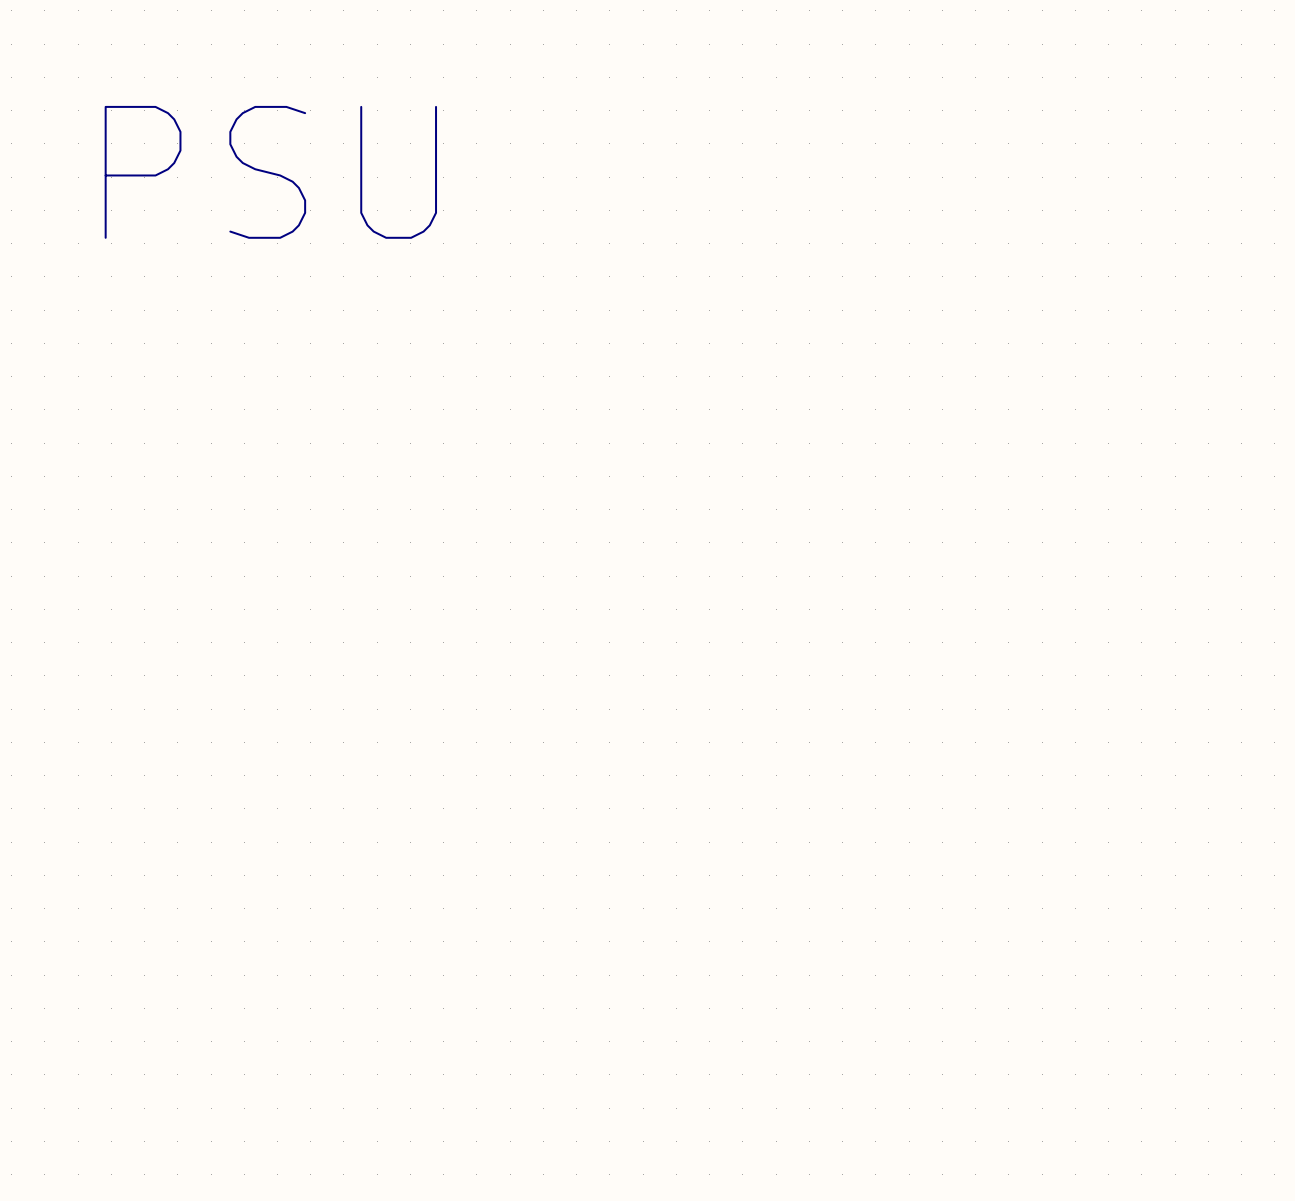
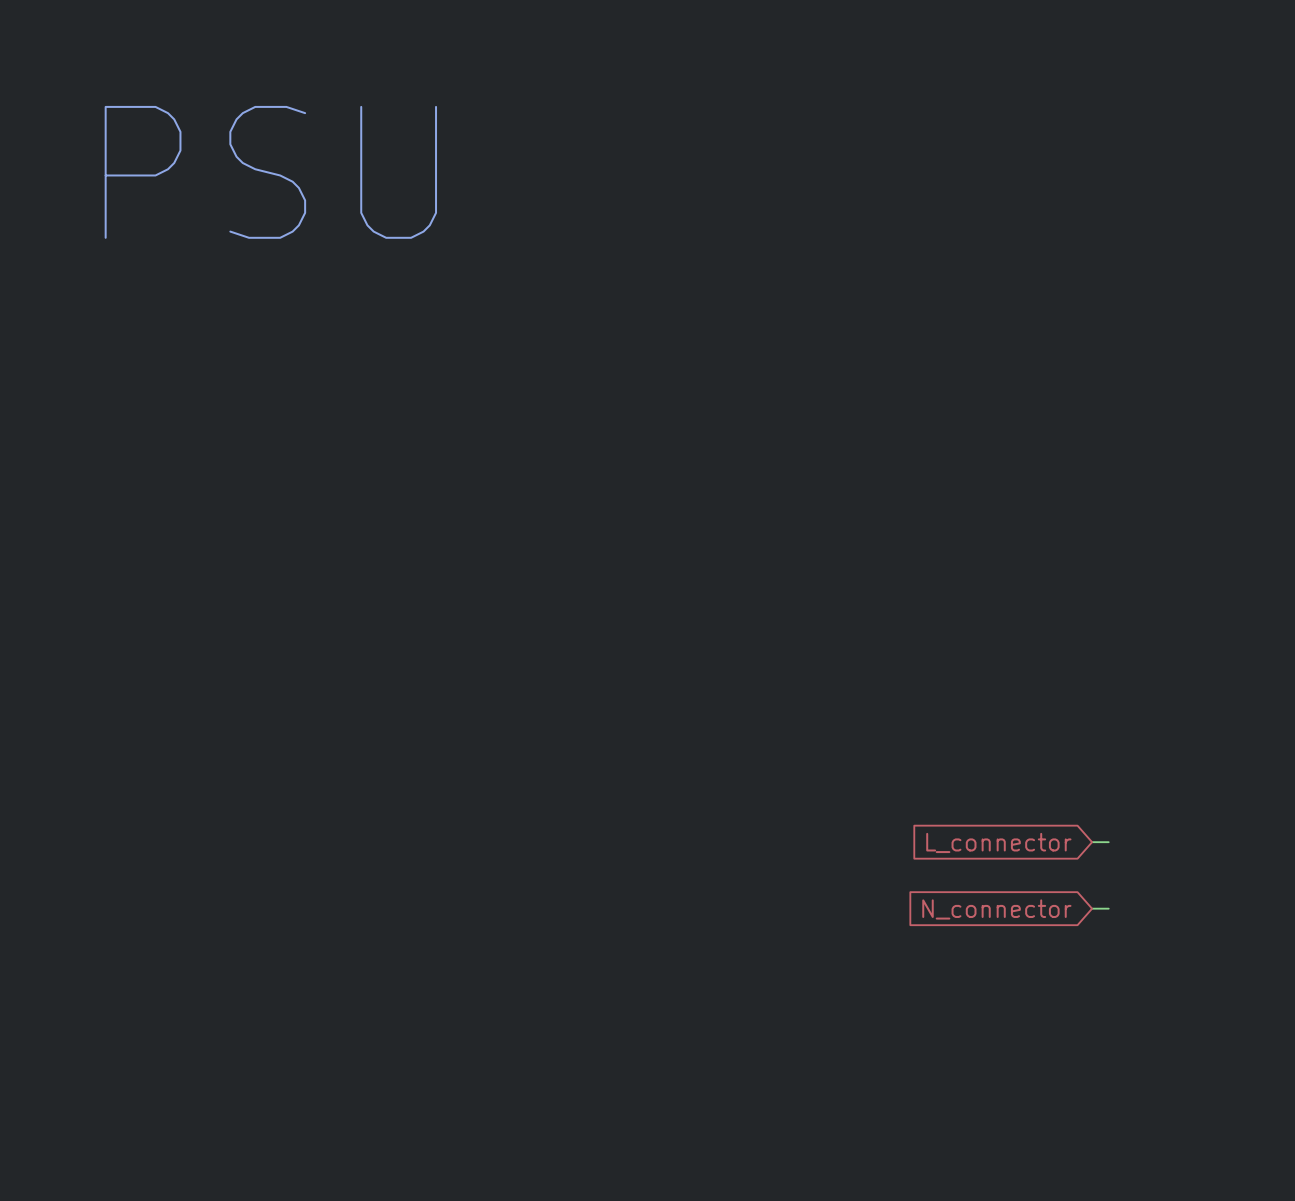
global label: none -> L_connector (998, 842)
wire: none -> (1092, 842) (1108, 842)
wire: none -> (1092, 908) (1108, 908)
global label: none -> N_connector (996, 909)

